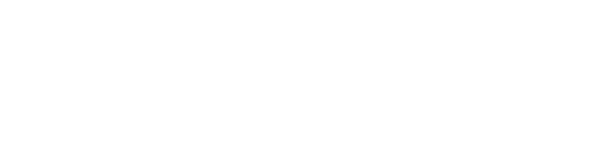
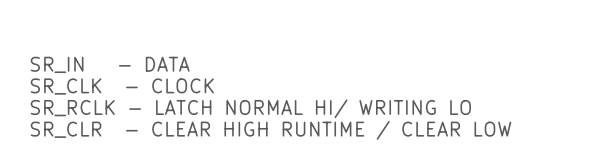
text: none -> SR_IN - DATA (110, 64)
text: none -> SR_CLK - CLOCK (122, 86)
text: none -> SR_RCLK - LATCH NORMAL HI/ WRITING LO (250, 108)
text: none -> SR_CLR - CLEAR HIGH RUNTIME / CLEAR LOW (270, 130)

